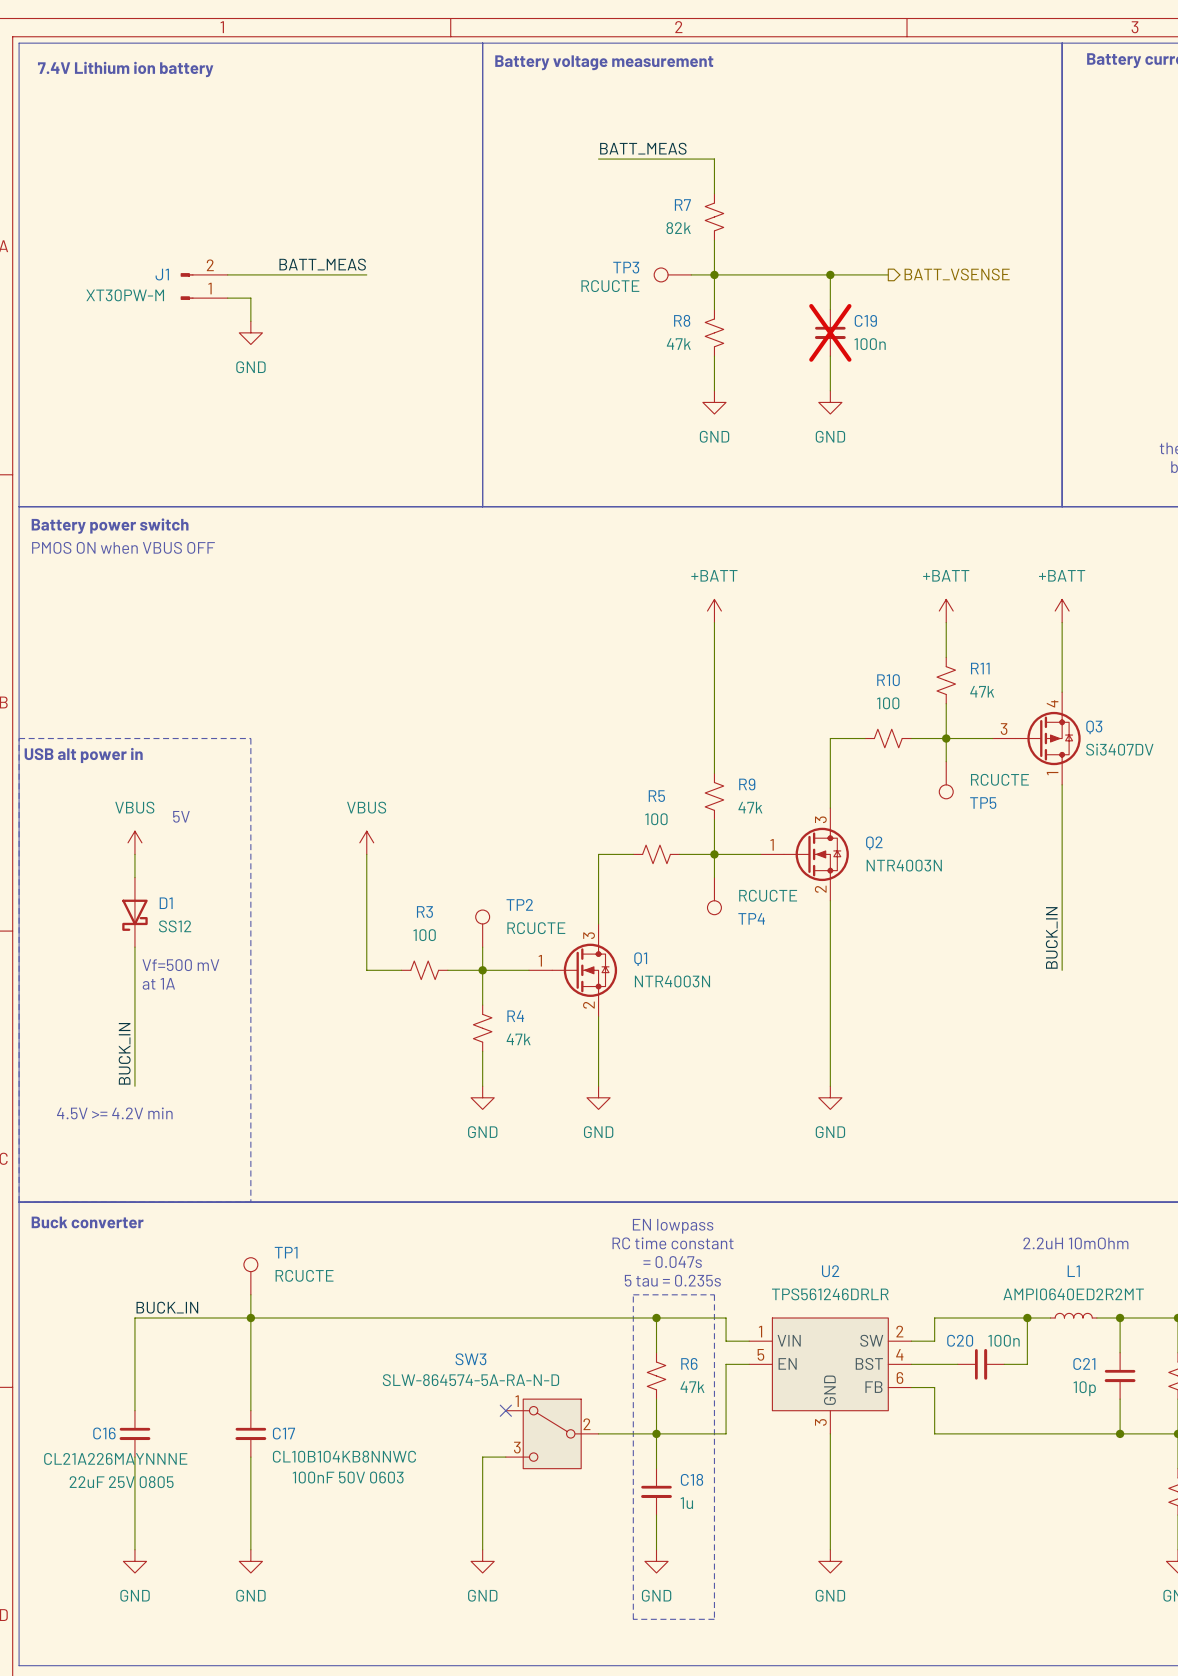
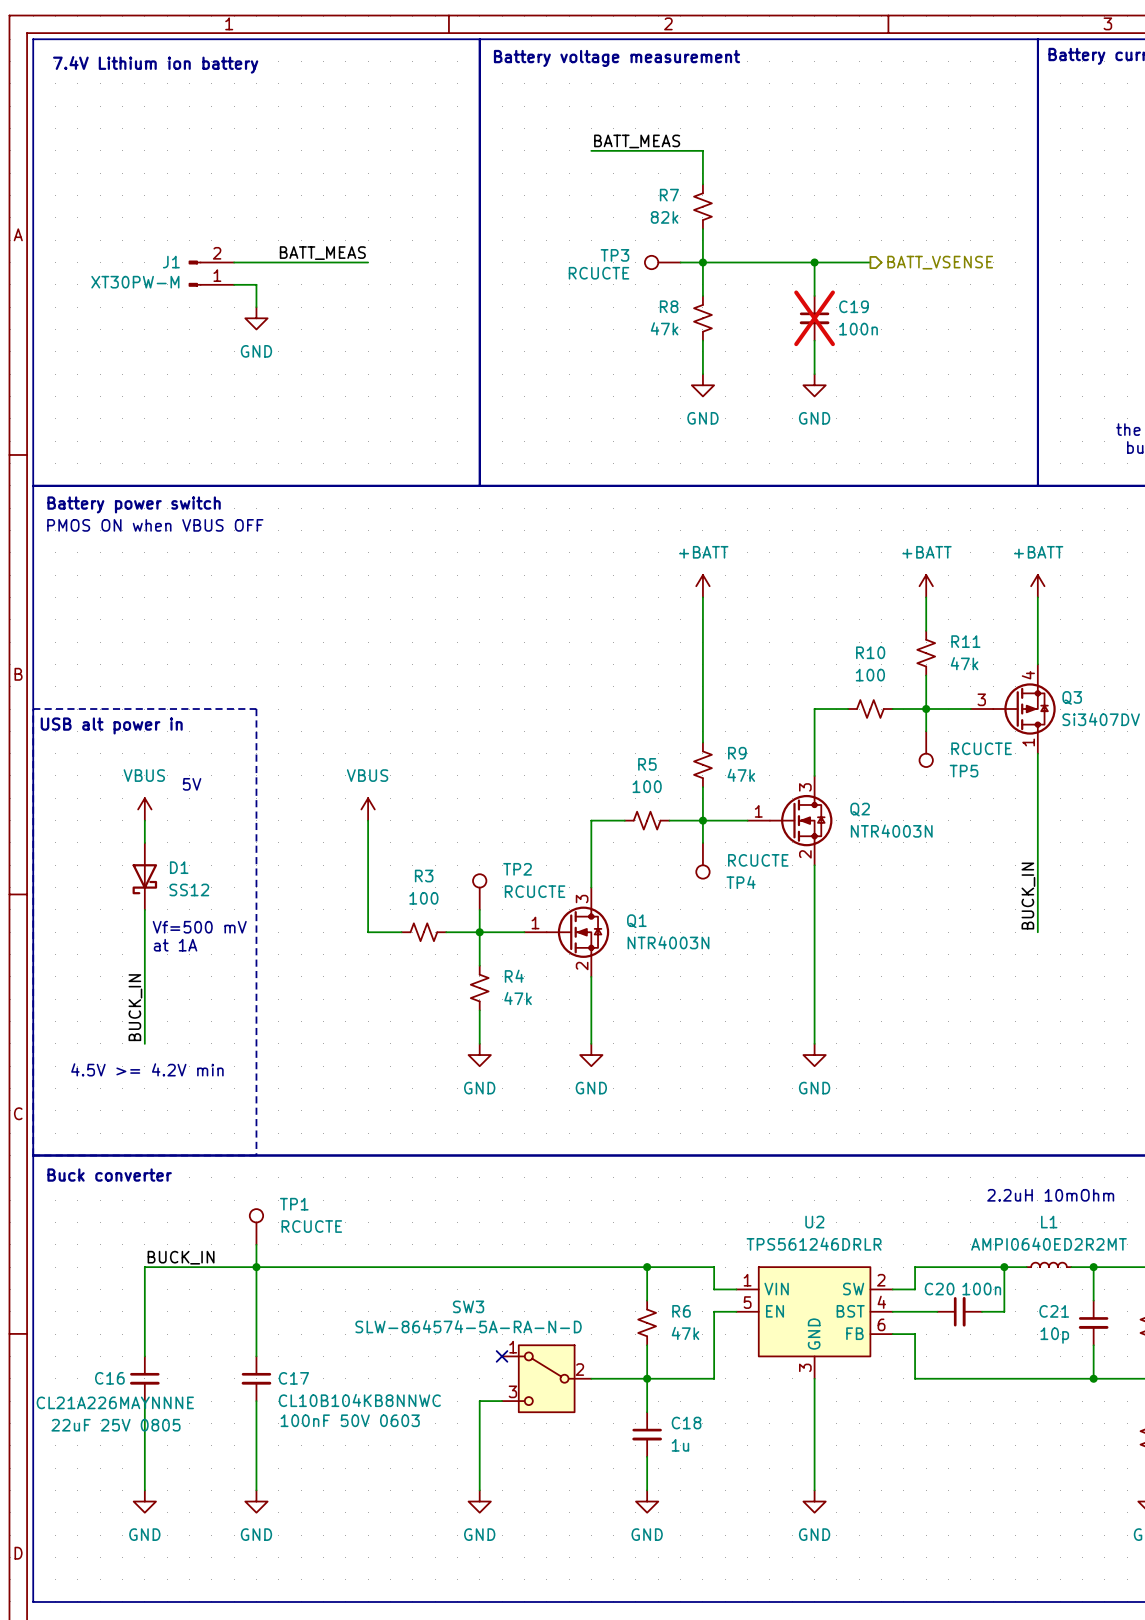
text: EN lowpass (673, 1226) -> none
text: RC time constant (673, 1243) -> none
text: = 0.047s (672, 1262) -> none
text: 5 tau = 0.235s (672, 1280) -> none
line: (633, 1294) (714, 1294) (714, 1619) (633, 1619) (633, 1294) -> none

